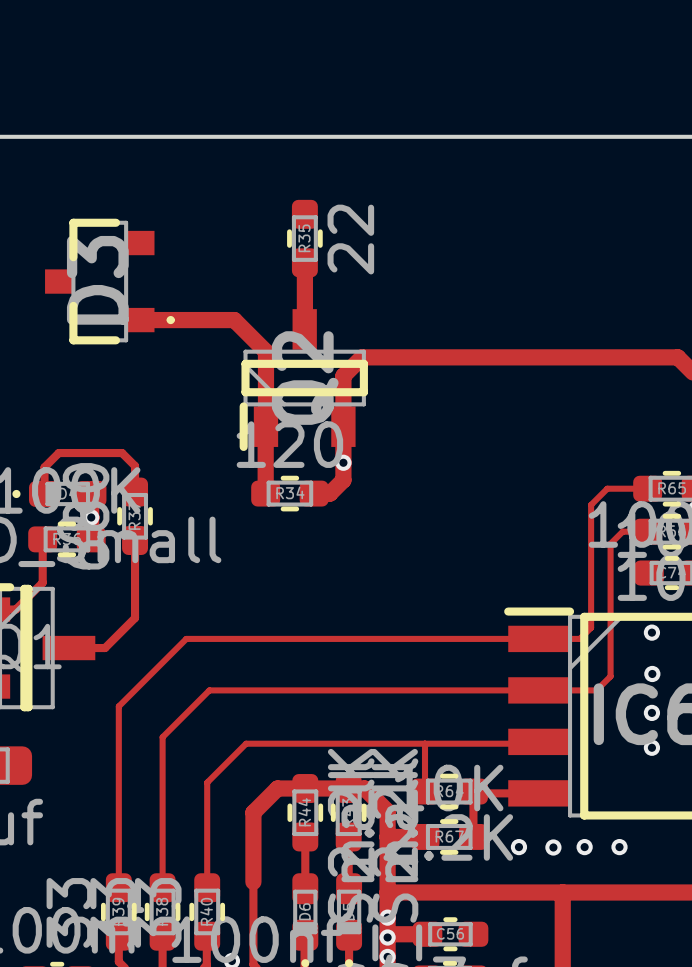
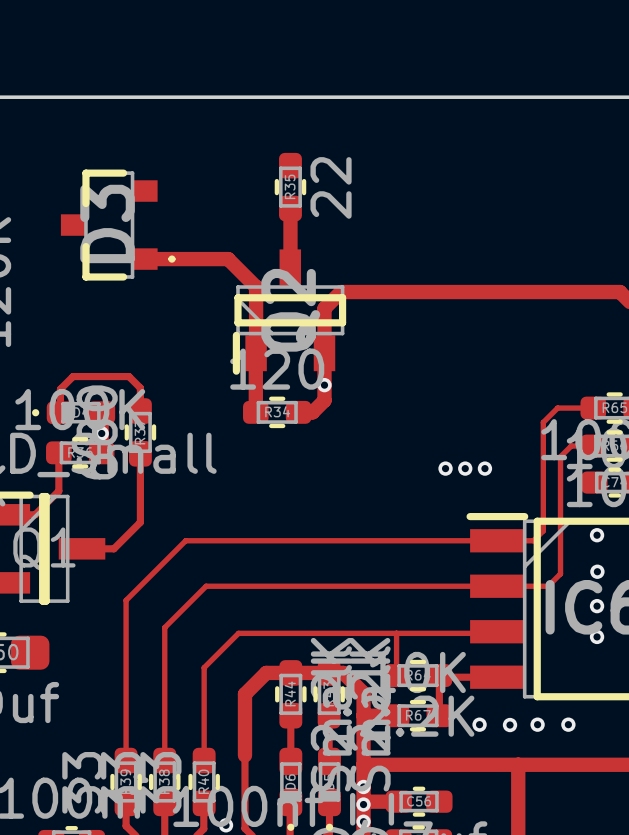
via: none -> (445, 468)
via: none -> (465, 468)
via: none -> (484, 468)

